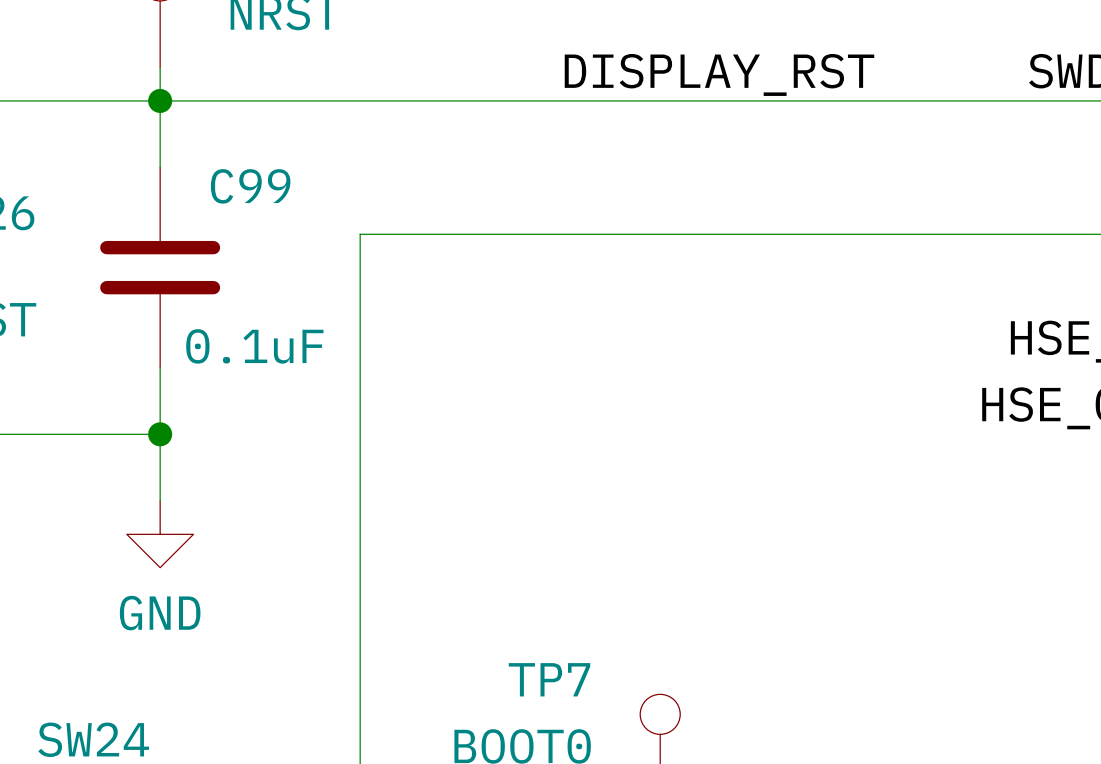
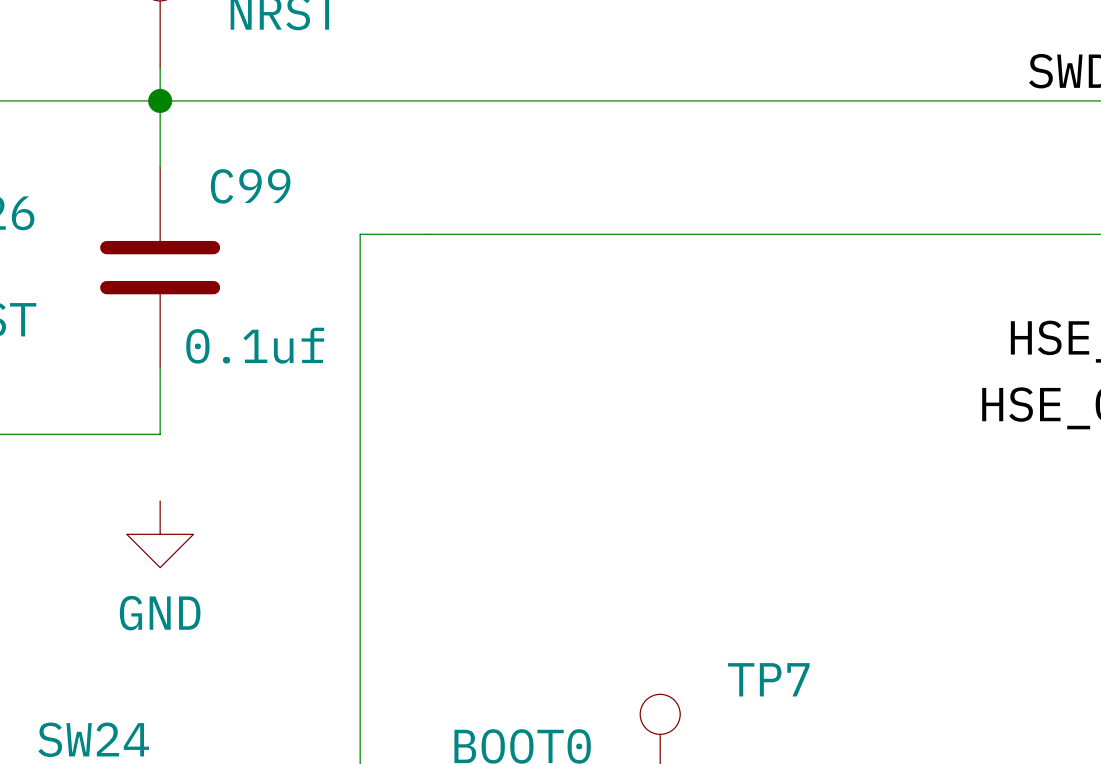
label: DISPLAY_RST (719, 74) -> none
C99 value: 0.1uF (254, 346) -> 0.1uf (255, 345)
wire: (160, 434) (160, 500) -> none
junction: (160, 434) -> none
TP7 name position: TP7 (549, 679) -> TP7 (768, 679)

